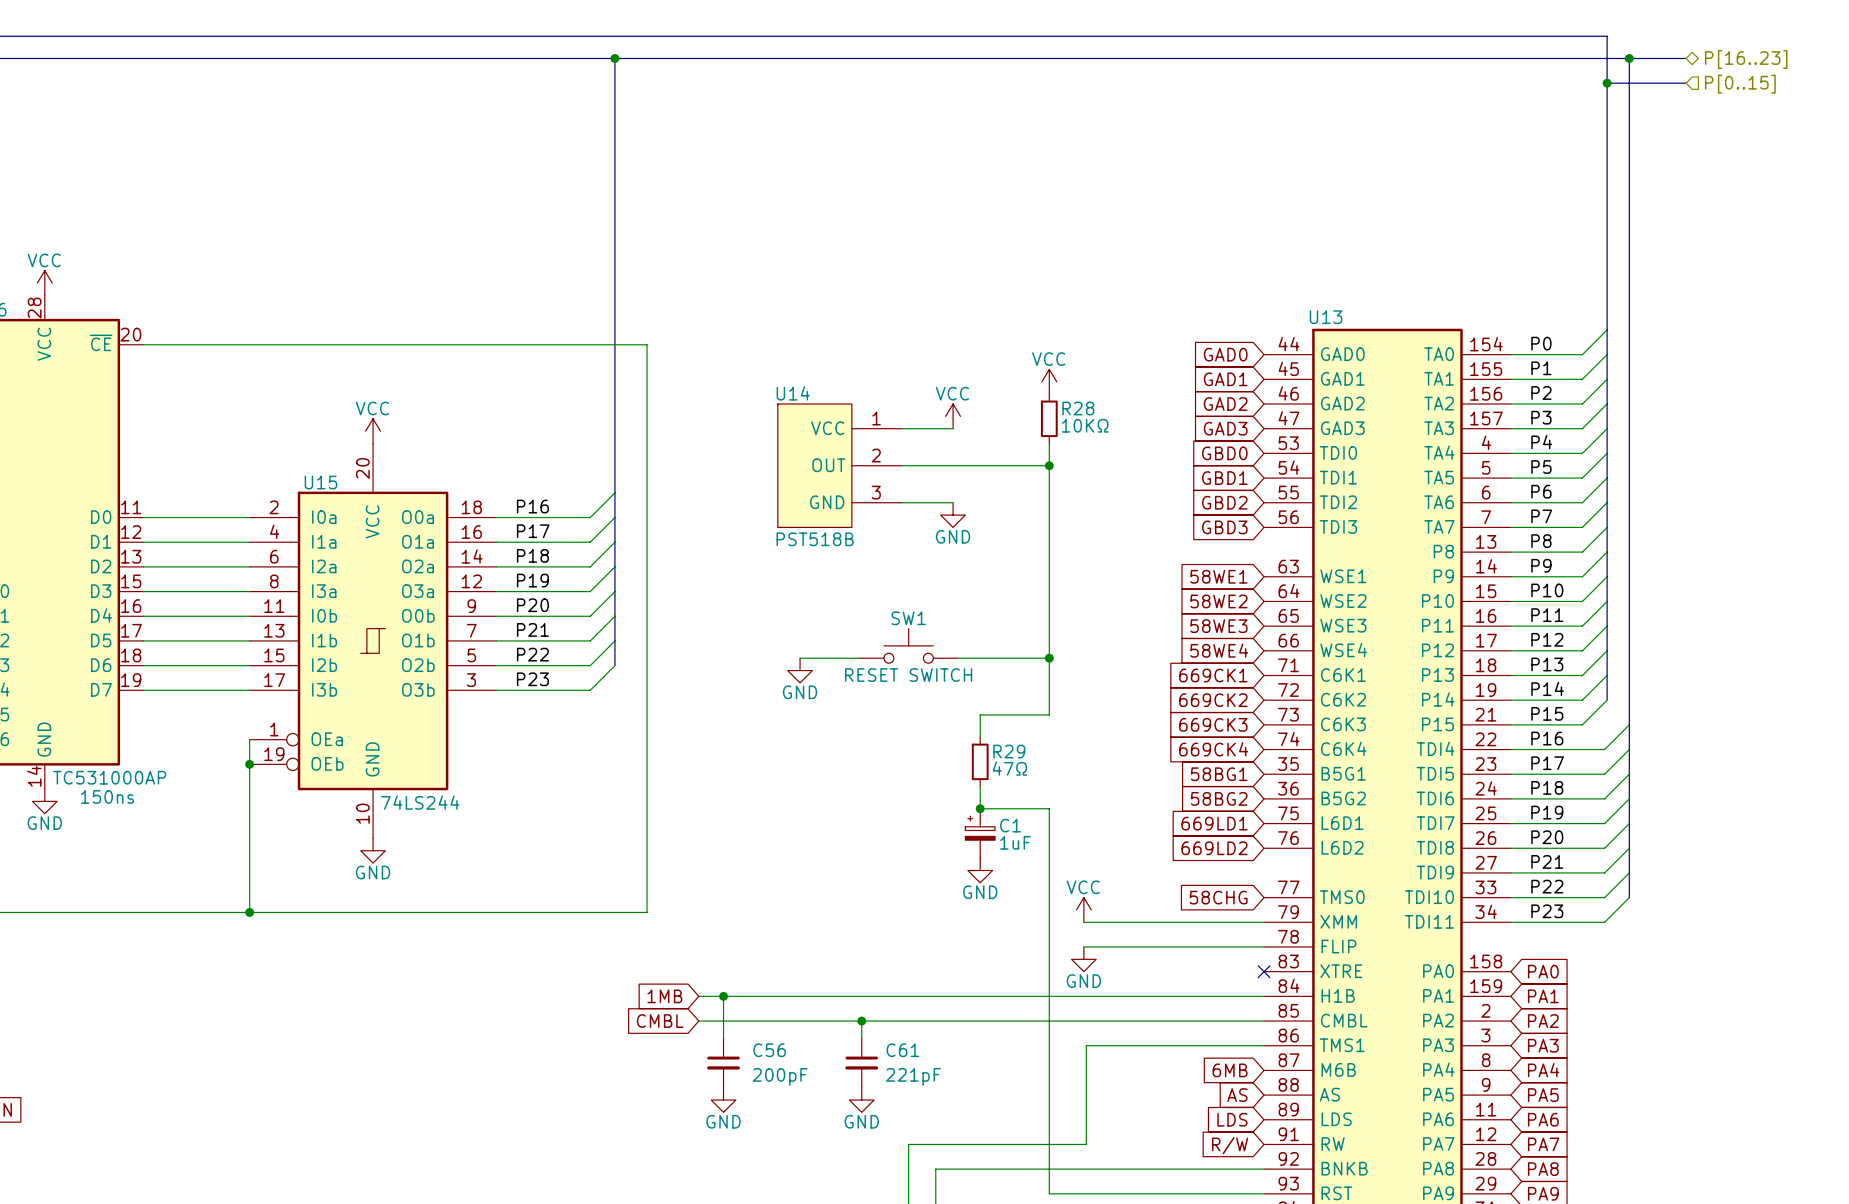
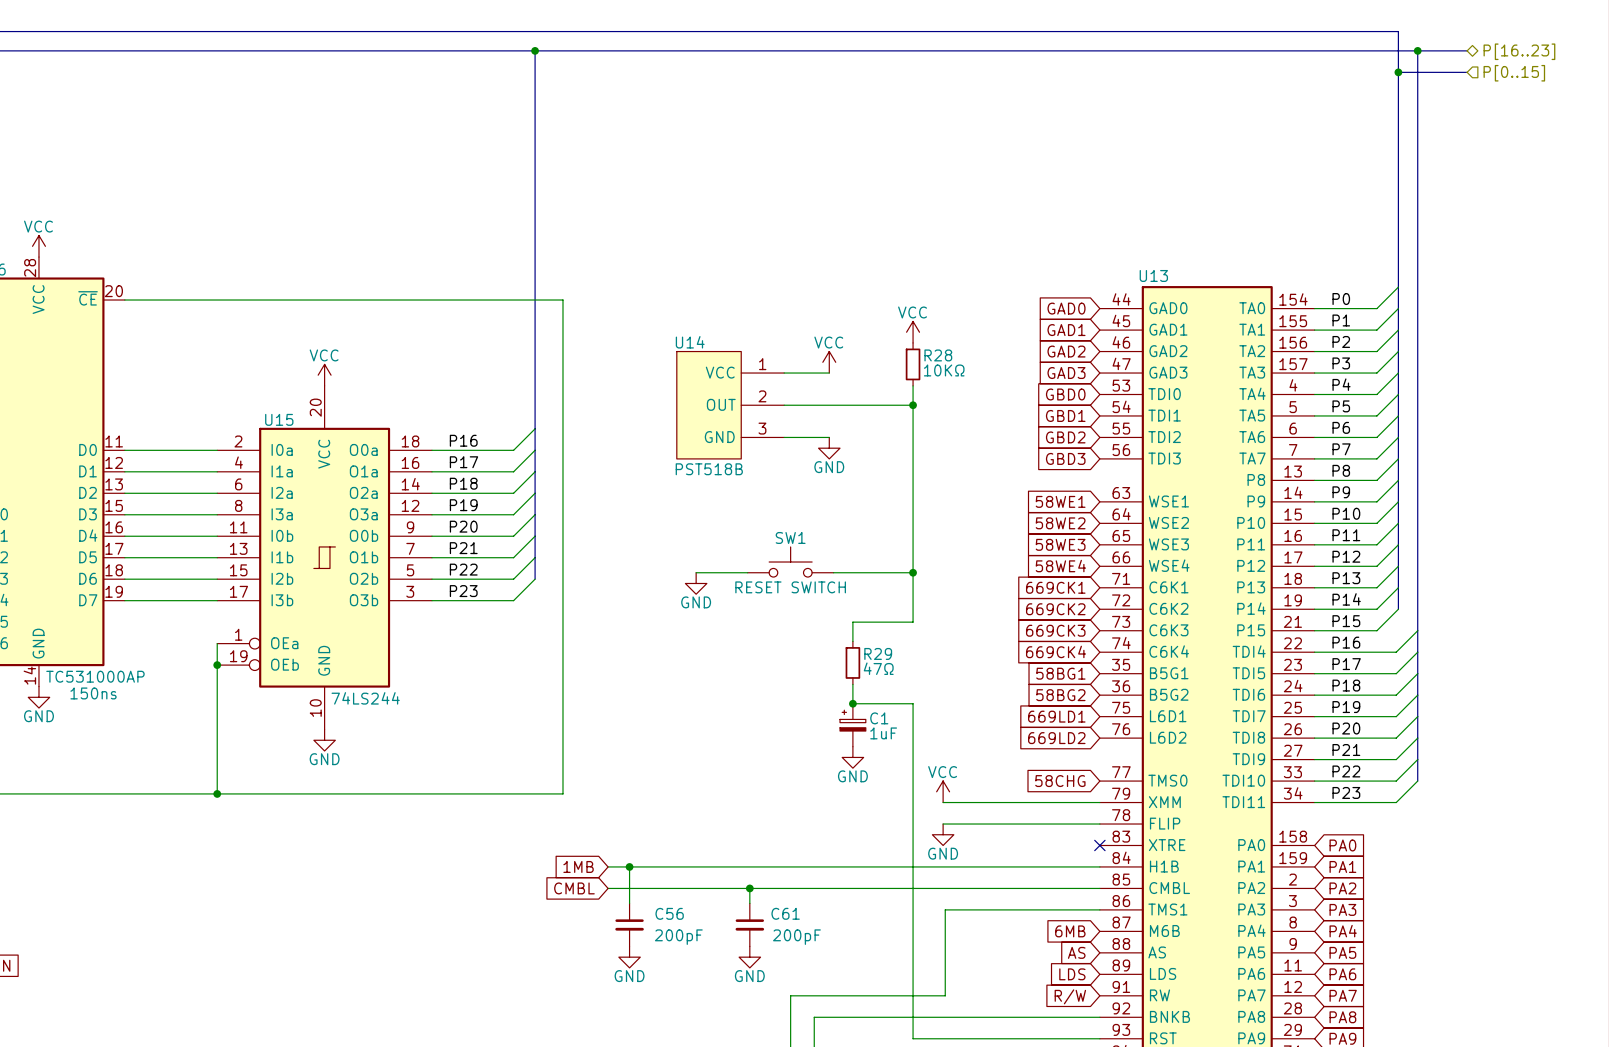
C61 value: 221pF (913, 1076) -> 200pF (796, 937)

